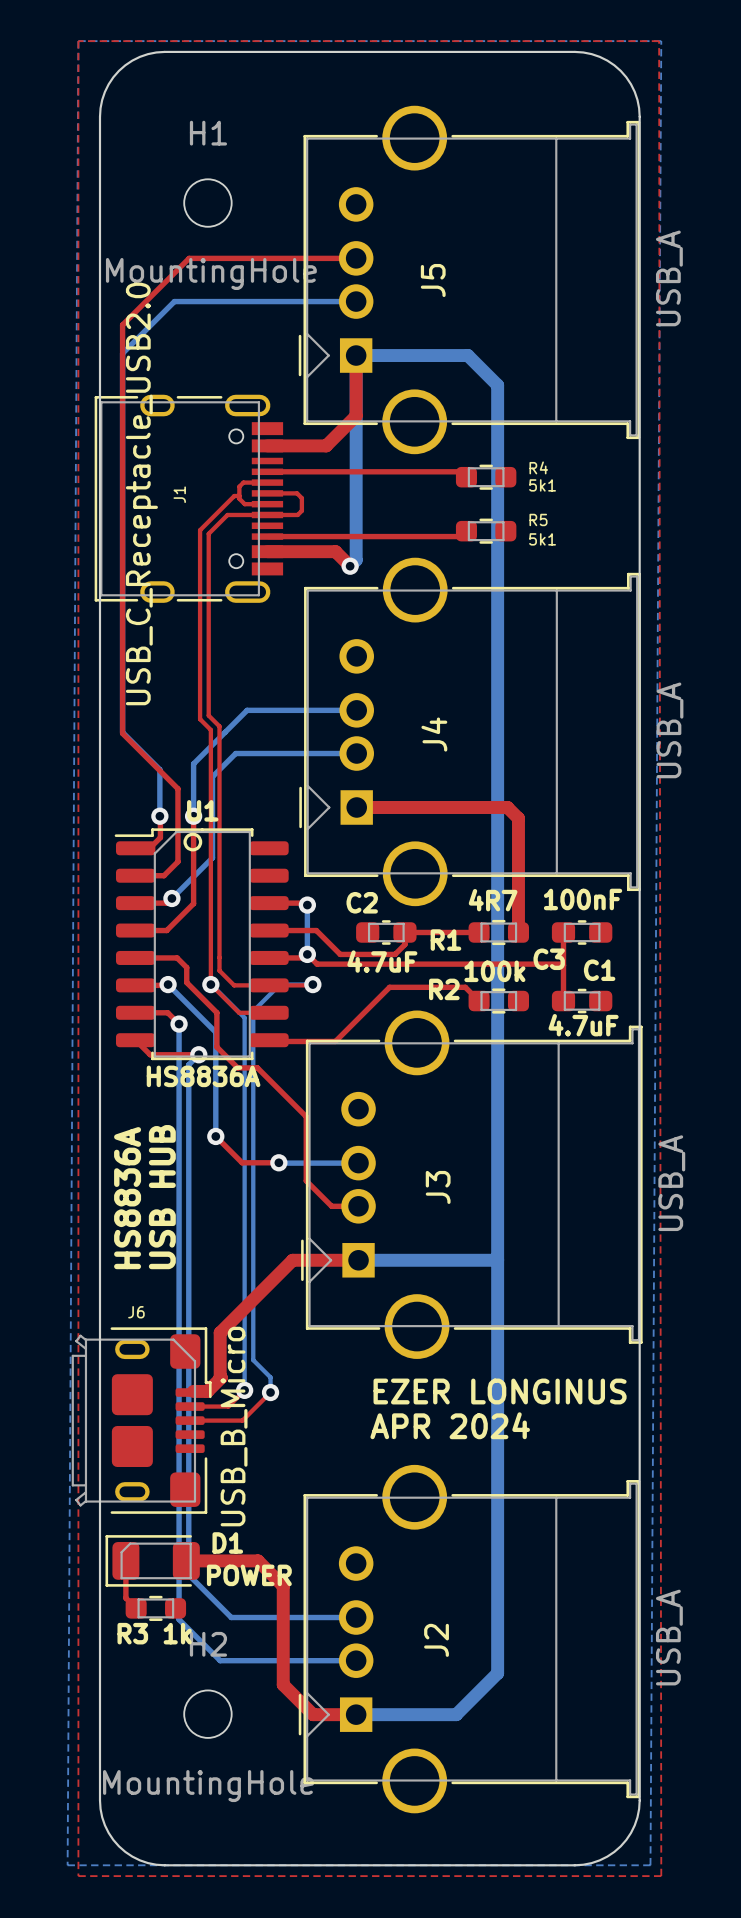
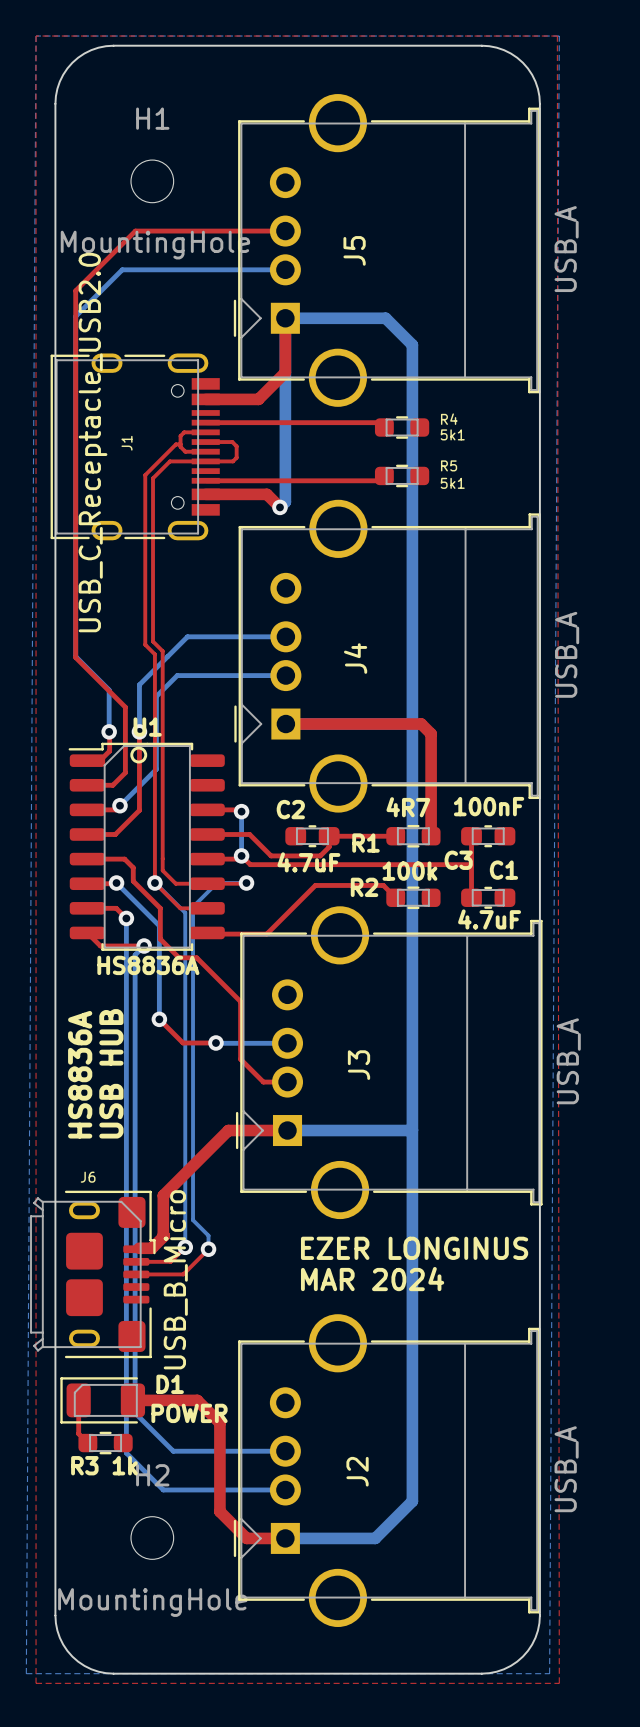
text: APR 2024 (450, 1425) -> MAR 2024 (372, 1279)

